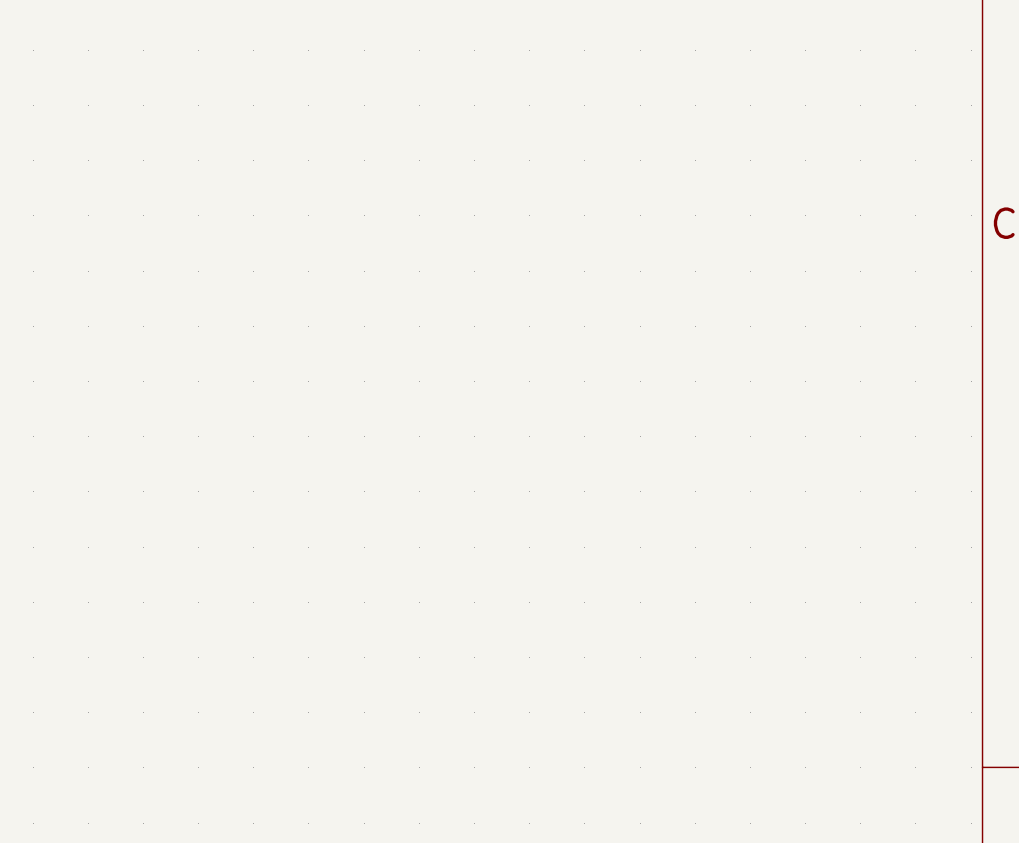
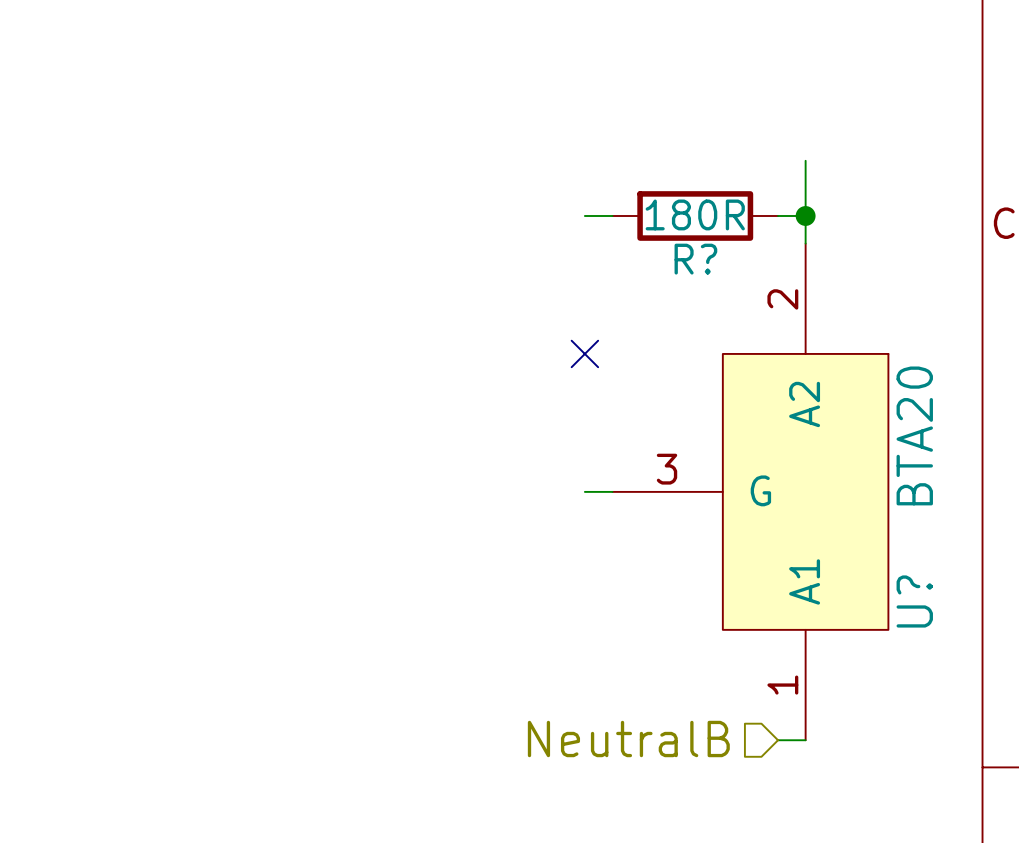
wire: none -> (805, 160) (805, 243)
wire: none -> (584, 215) (612, 215)
R?: none -> 180R (695, 215)
wire: none -> (778, 215) (805, 215)
junction: none -> (805, 215)
no-connect mark: none -> (584, 353)
wire: none -> (584, 491) (612, 491)
U?: none -> BTA20 (750, 491)
hierarchical label: none -> NeutralB (628, 739)
wire: none -> (778, 740) (805, 740)

